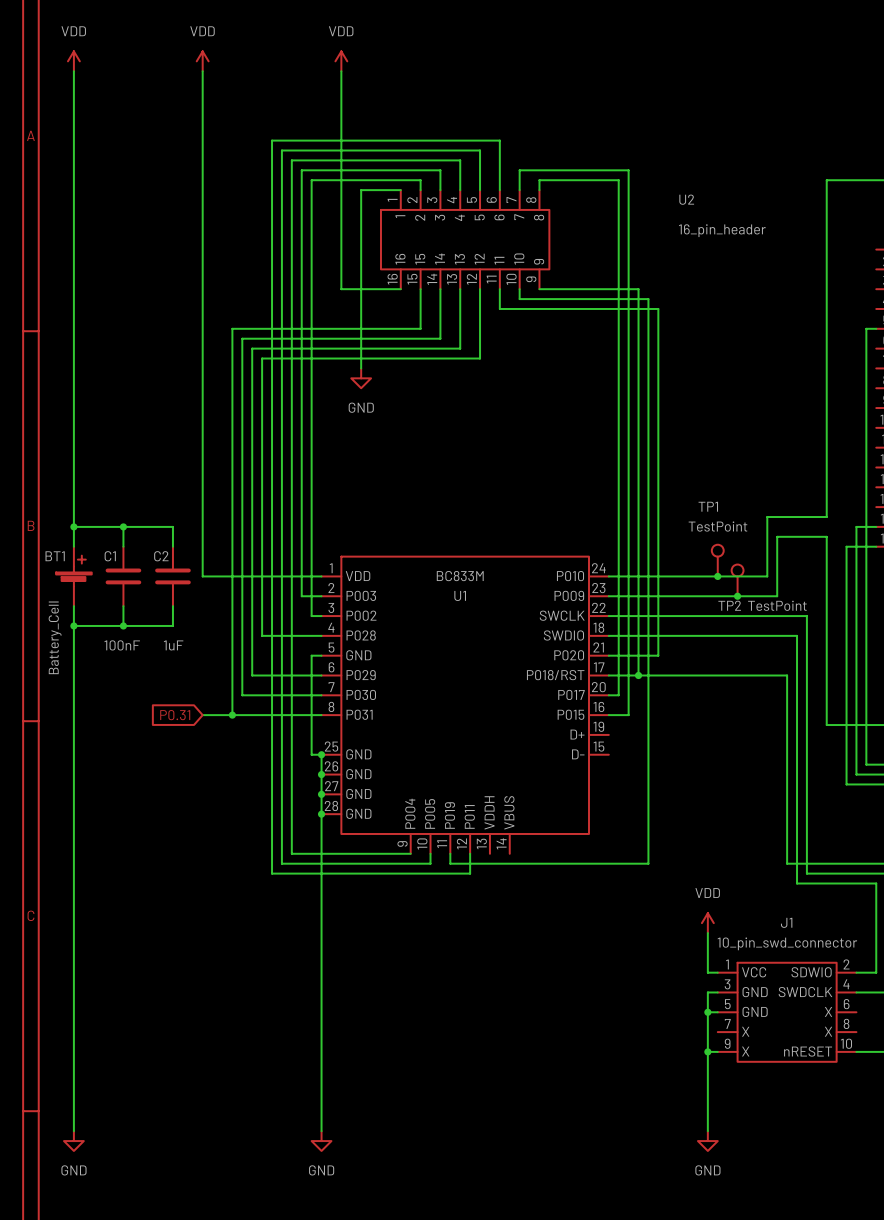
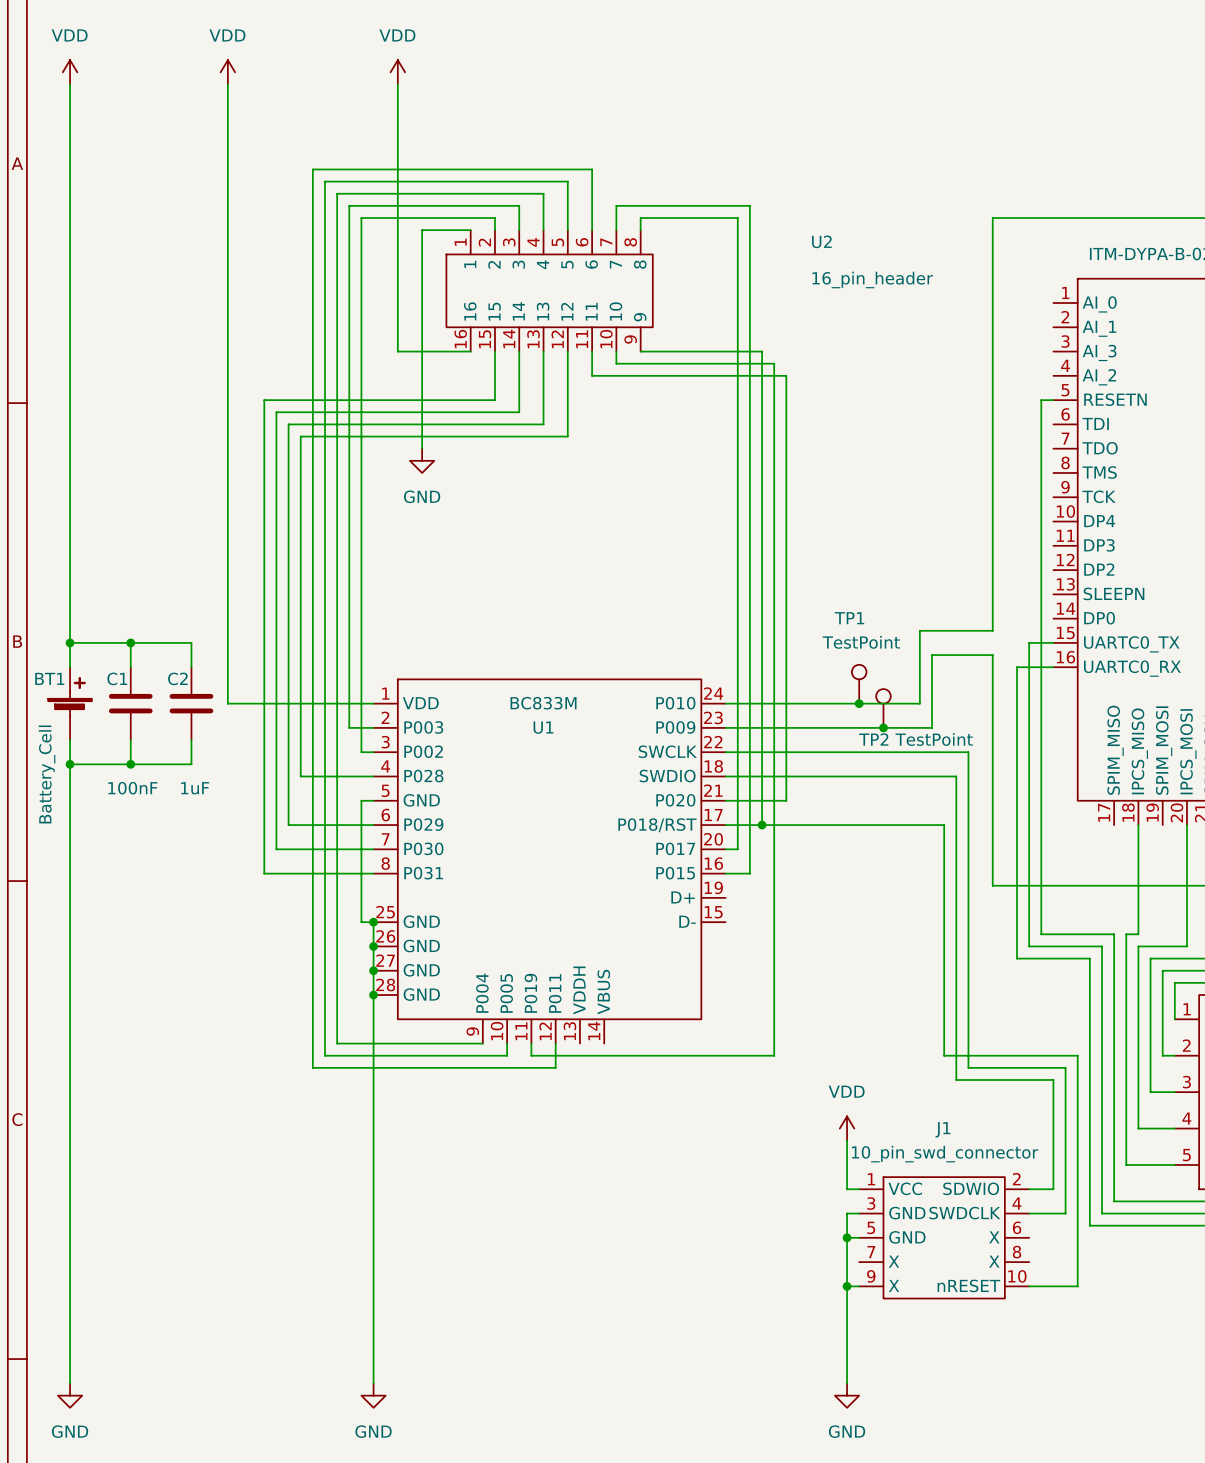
global label: P0.31 (175, 715) -> none
wire: (202, 715) (232, 715) -> none
junction: (232, 715) -> none

